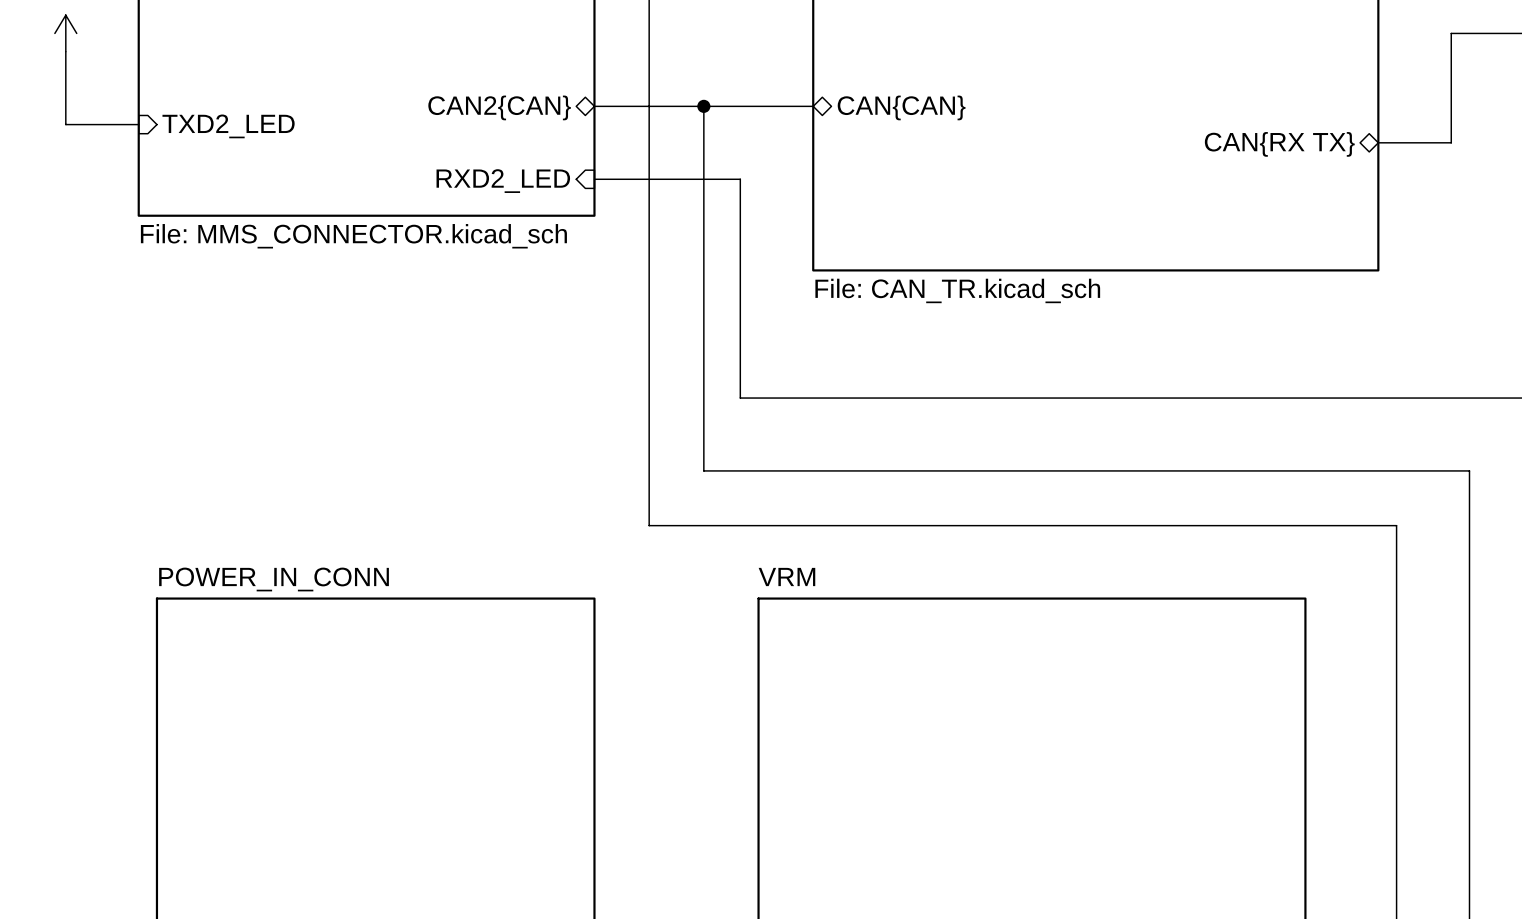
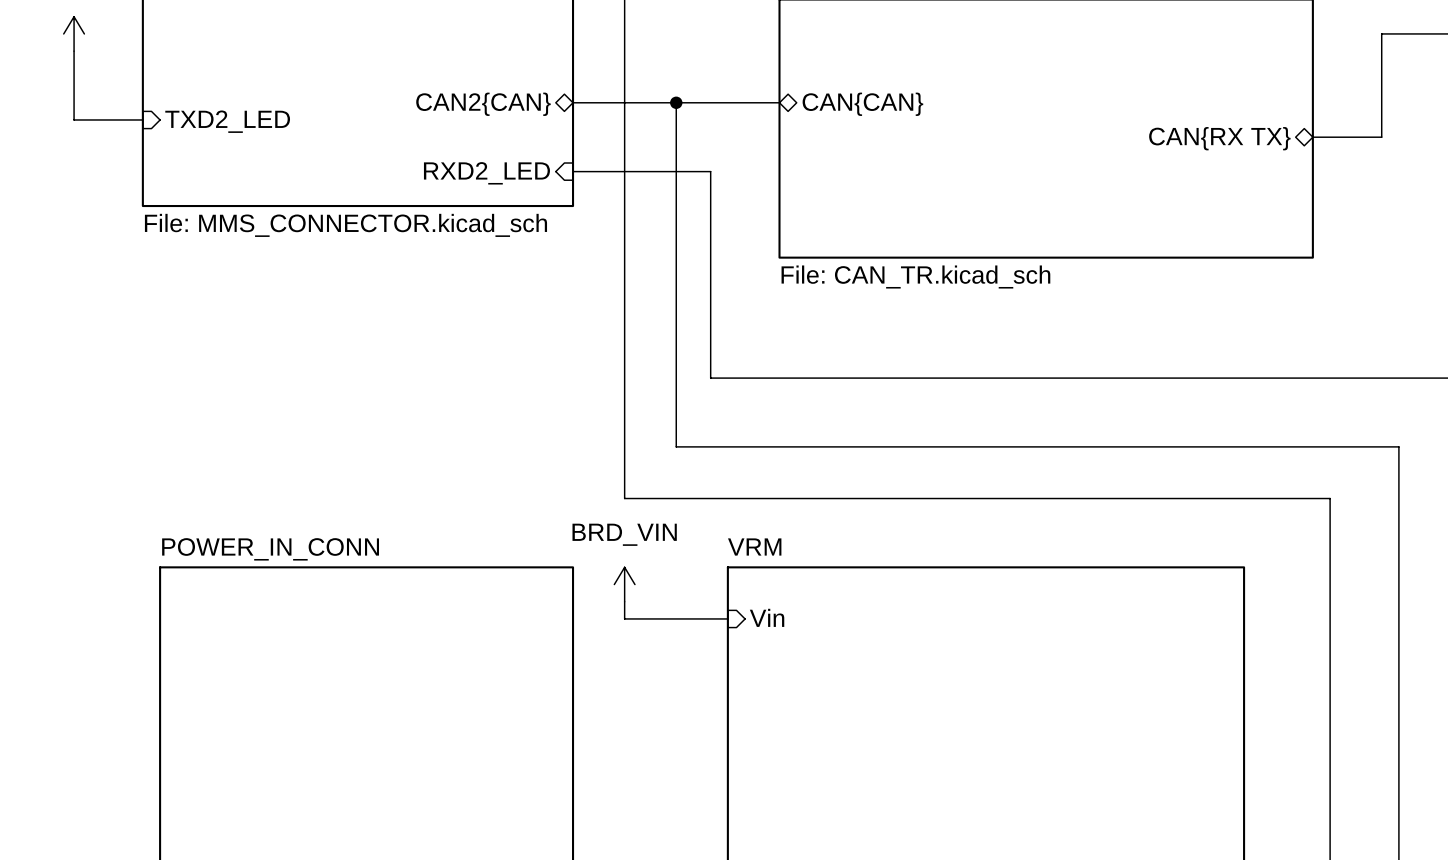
power symbol: none -> BRD_VIN (624, 584)
wire: none -> (624, 601) (624, 618) (727, 618)
sheet pin: none -> Vin (767, 617)

